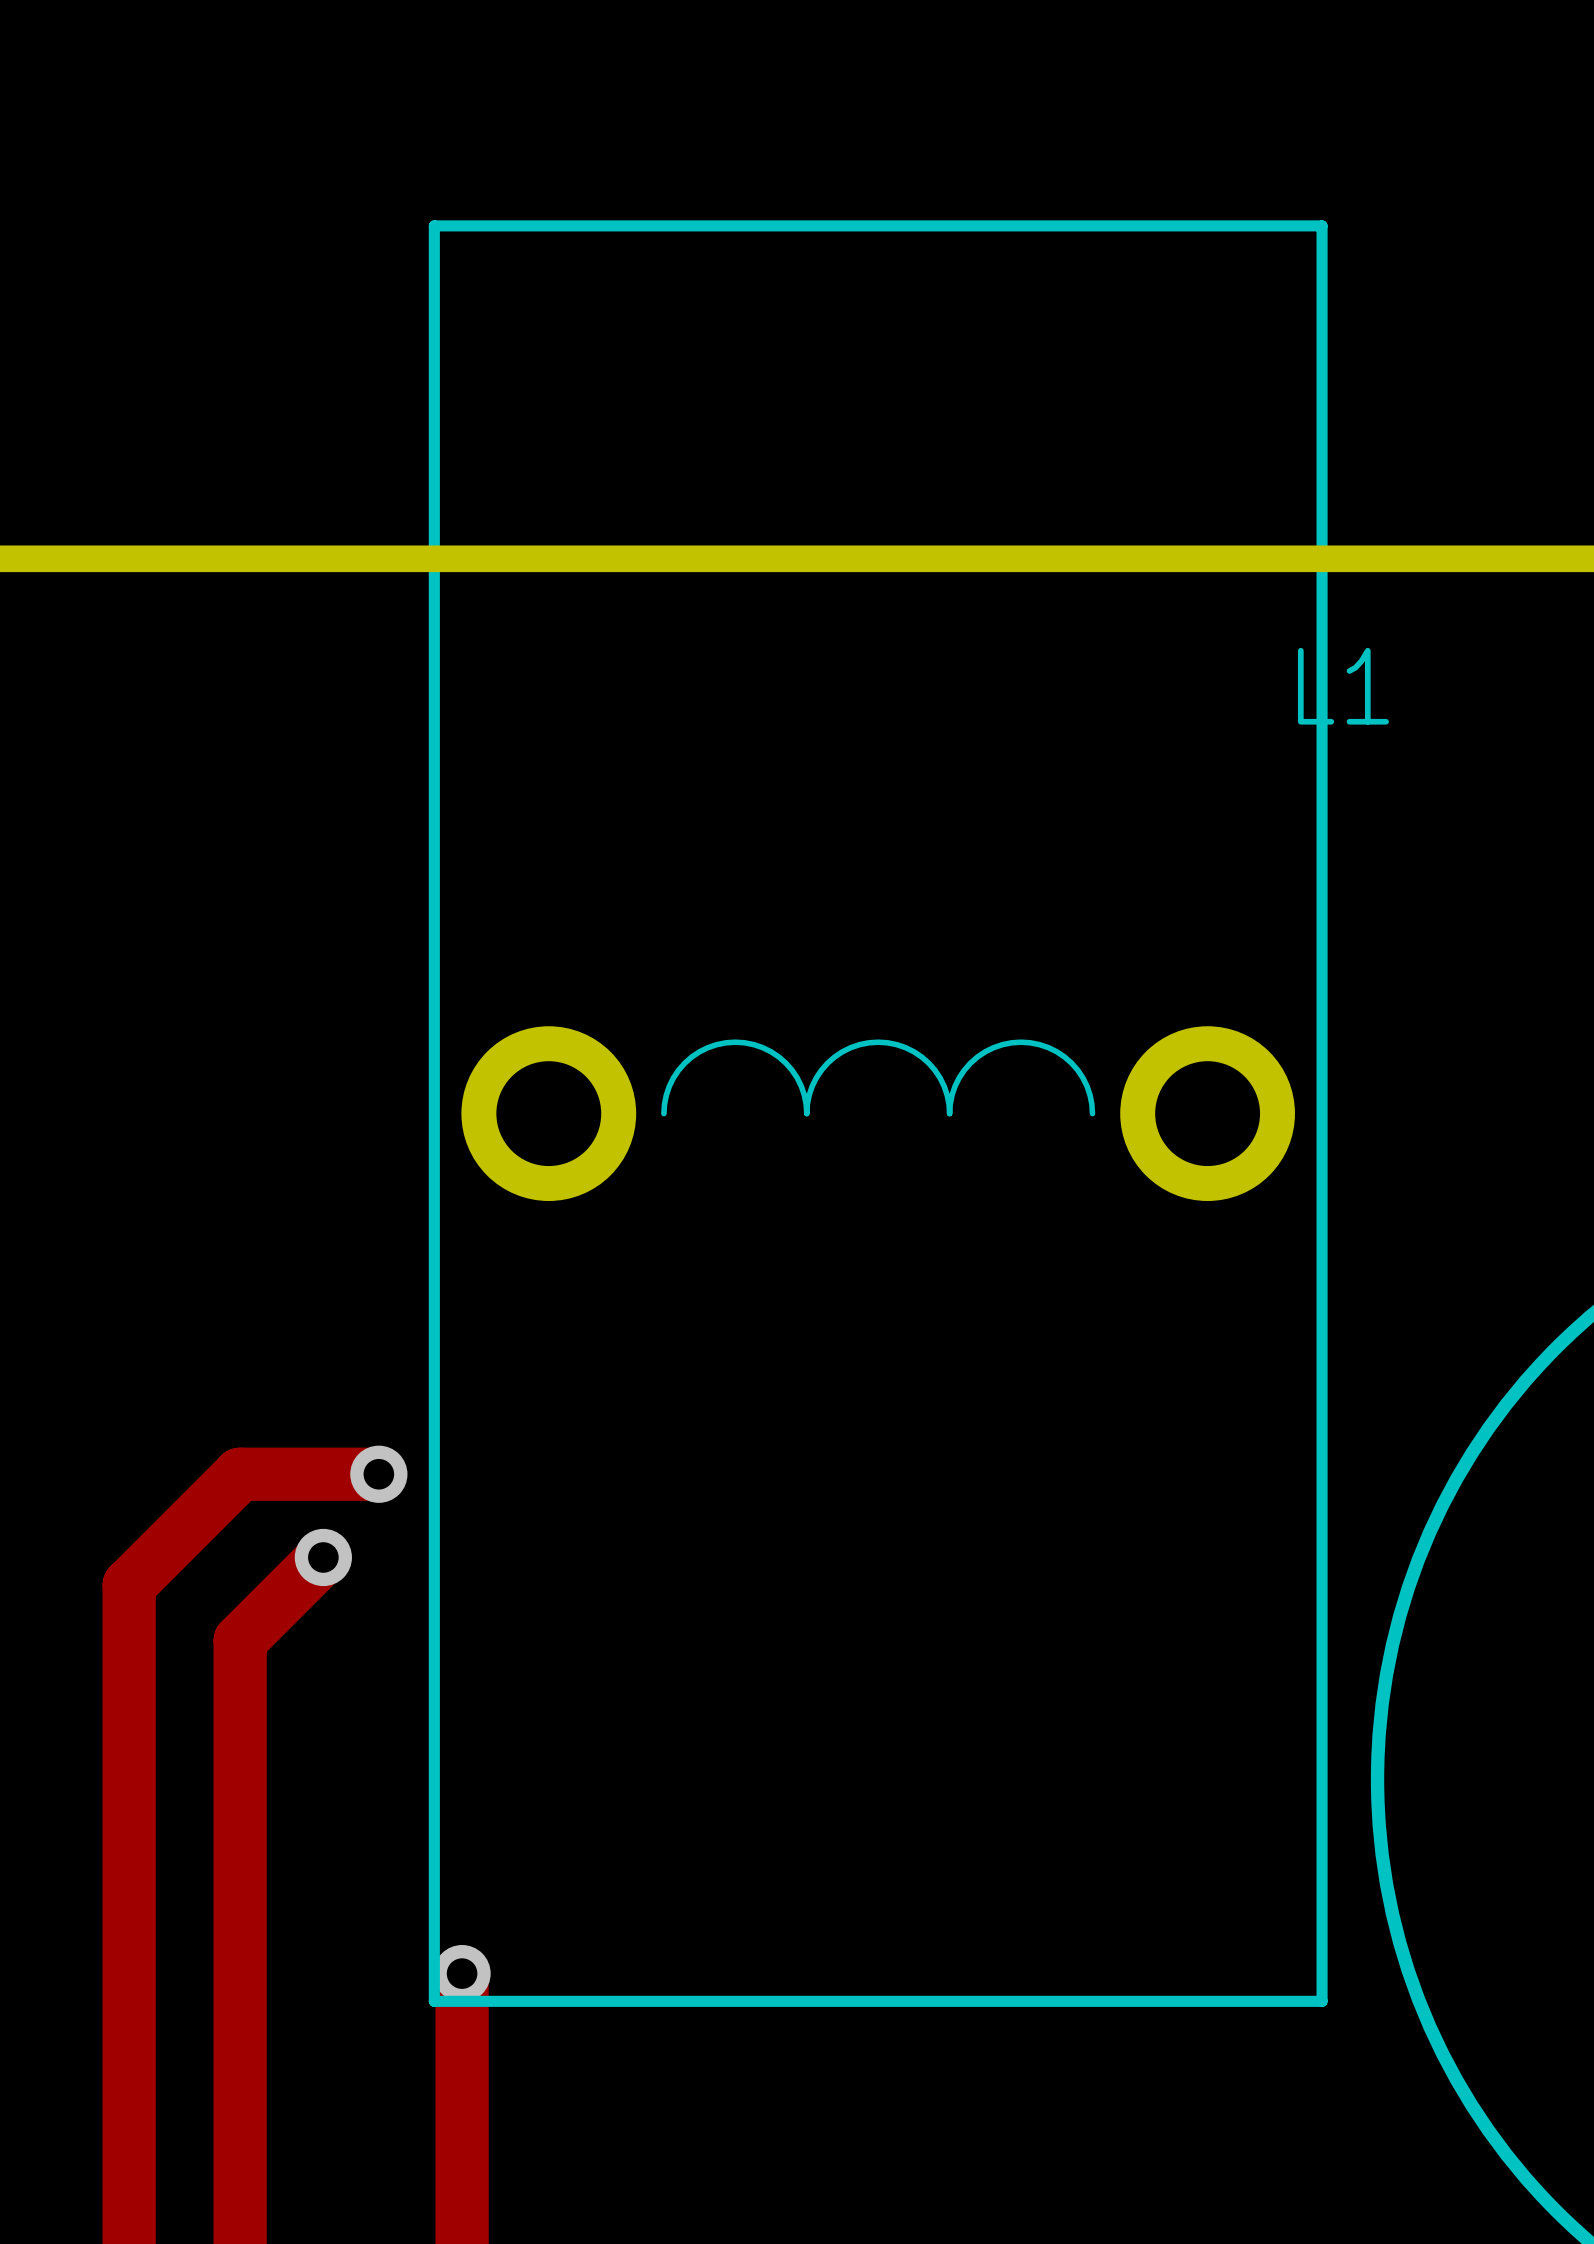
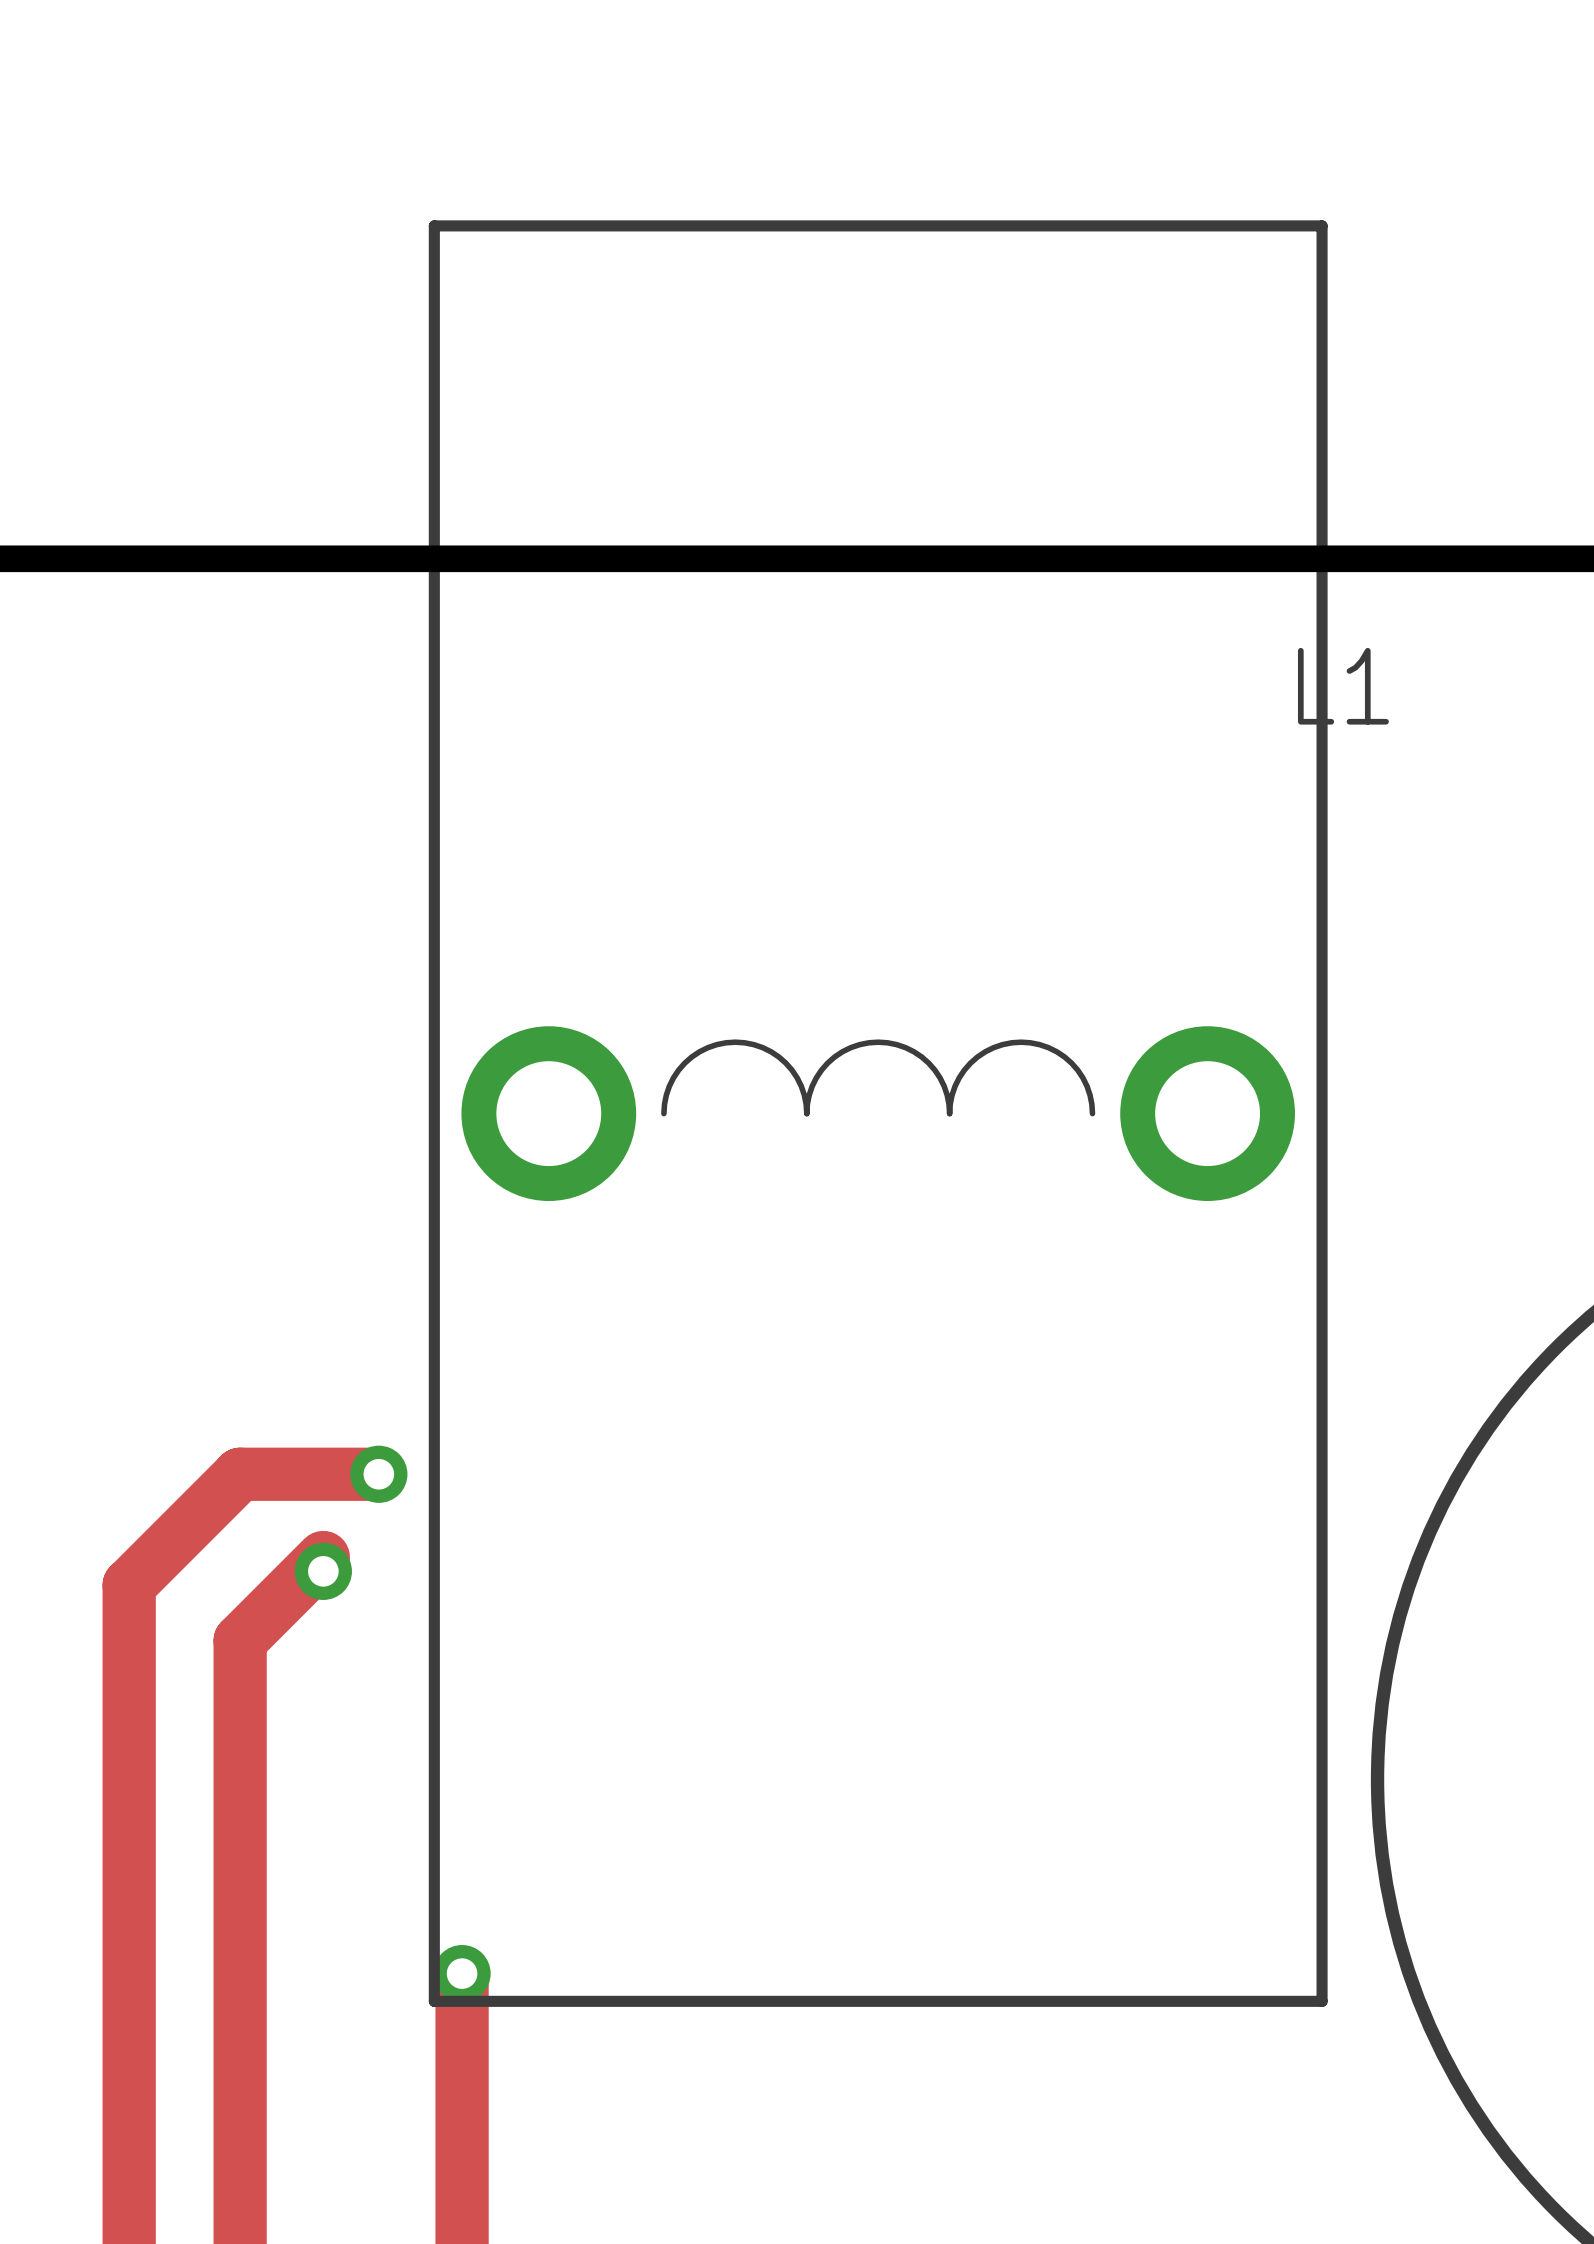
via position: (323, 1557) -> (323, 1571)

